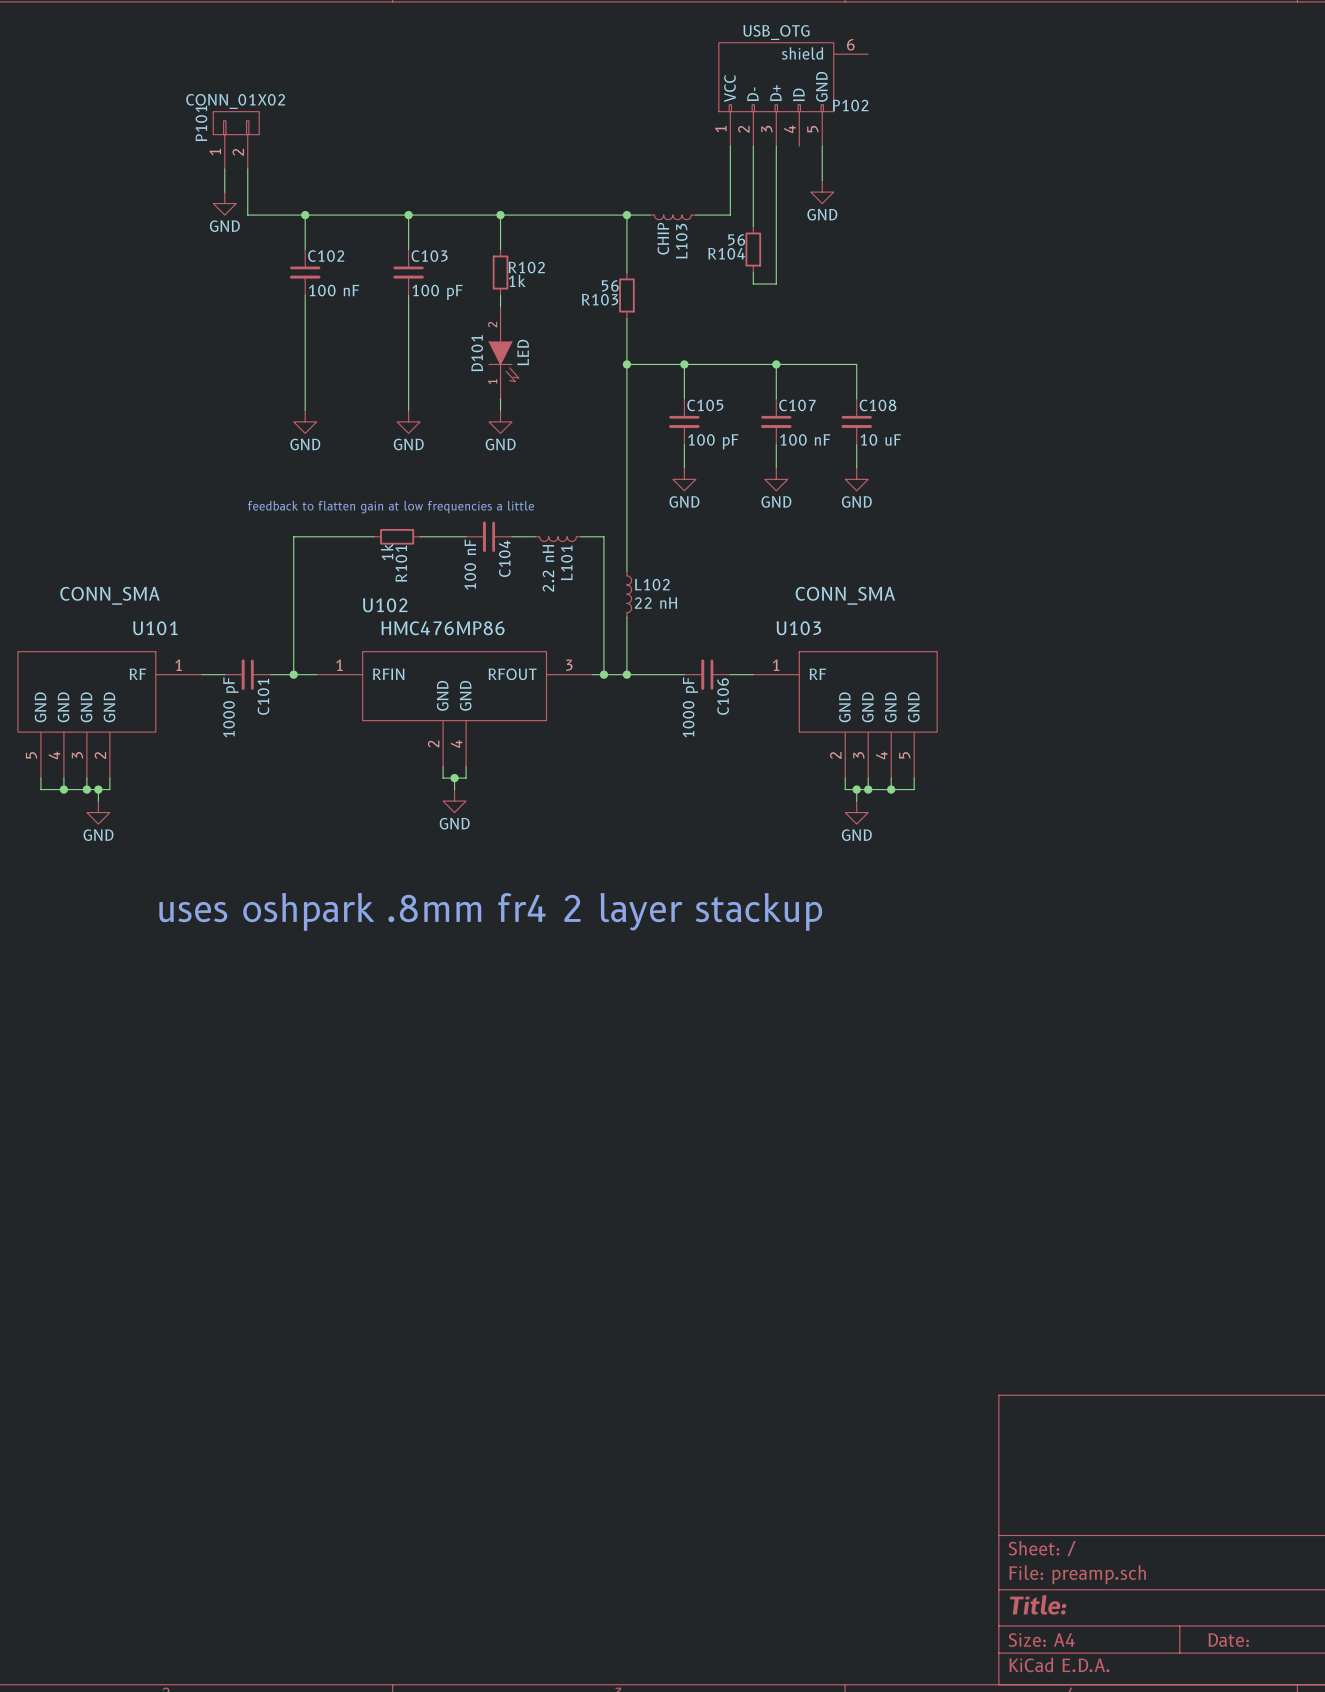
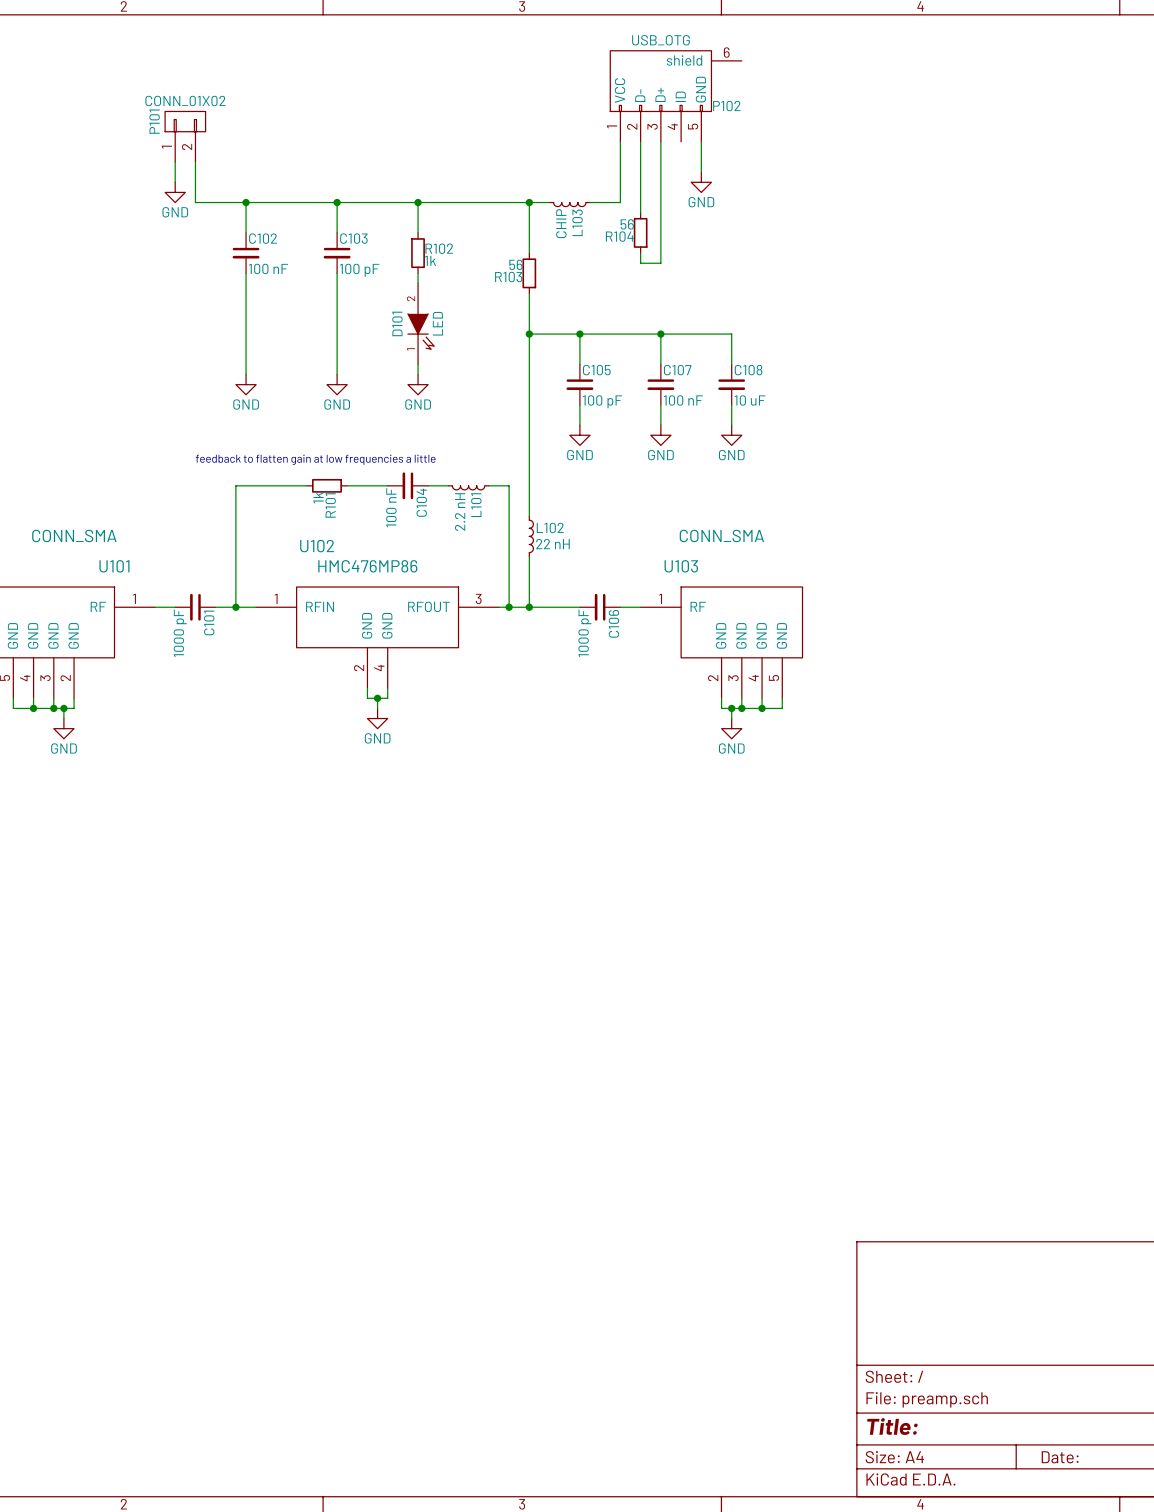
text: uses oshpark .8mm fr4 2 layer stackup (490, 911) -> none

